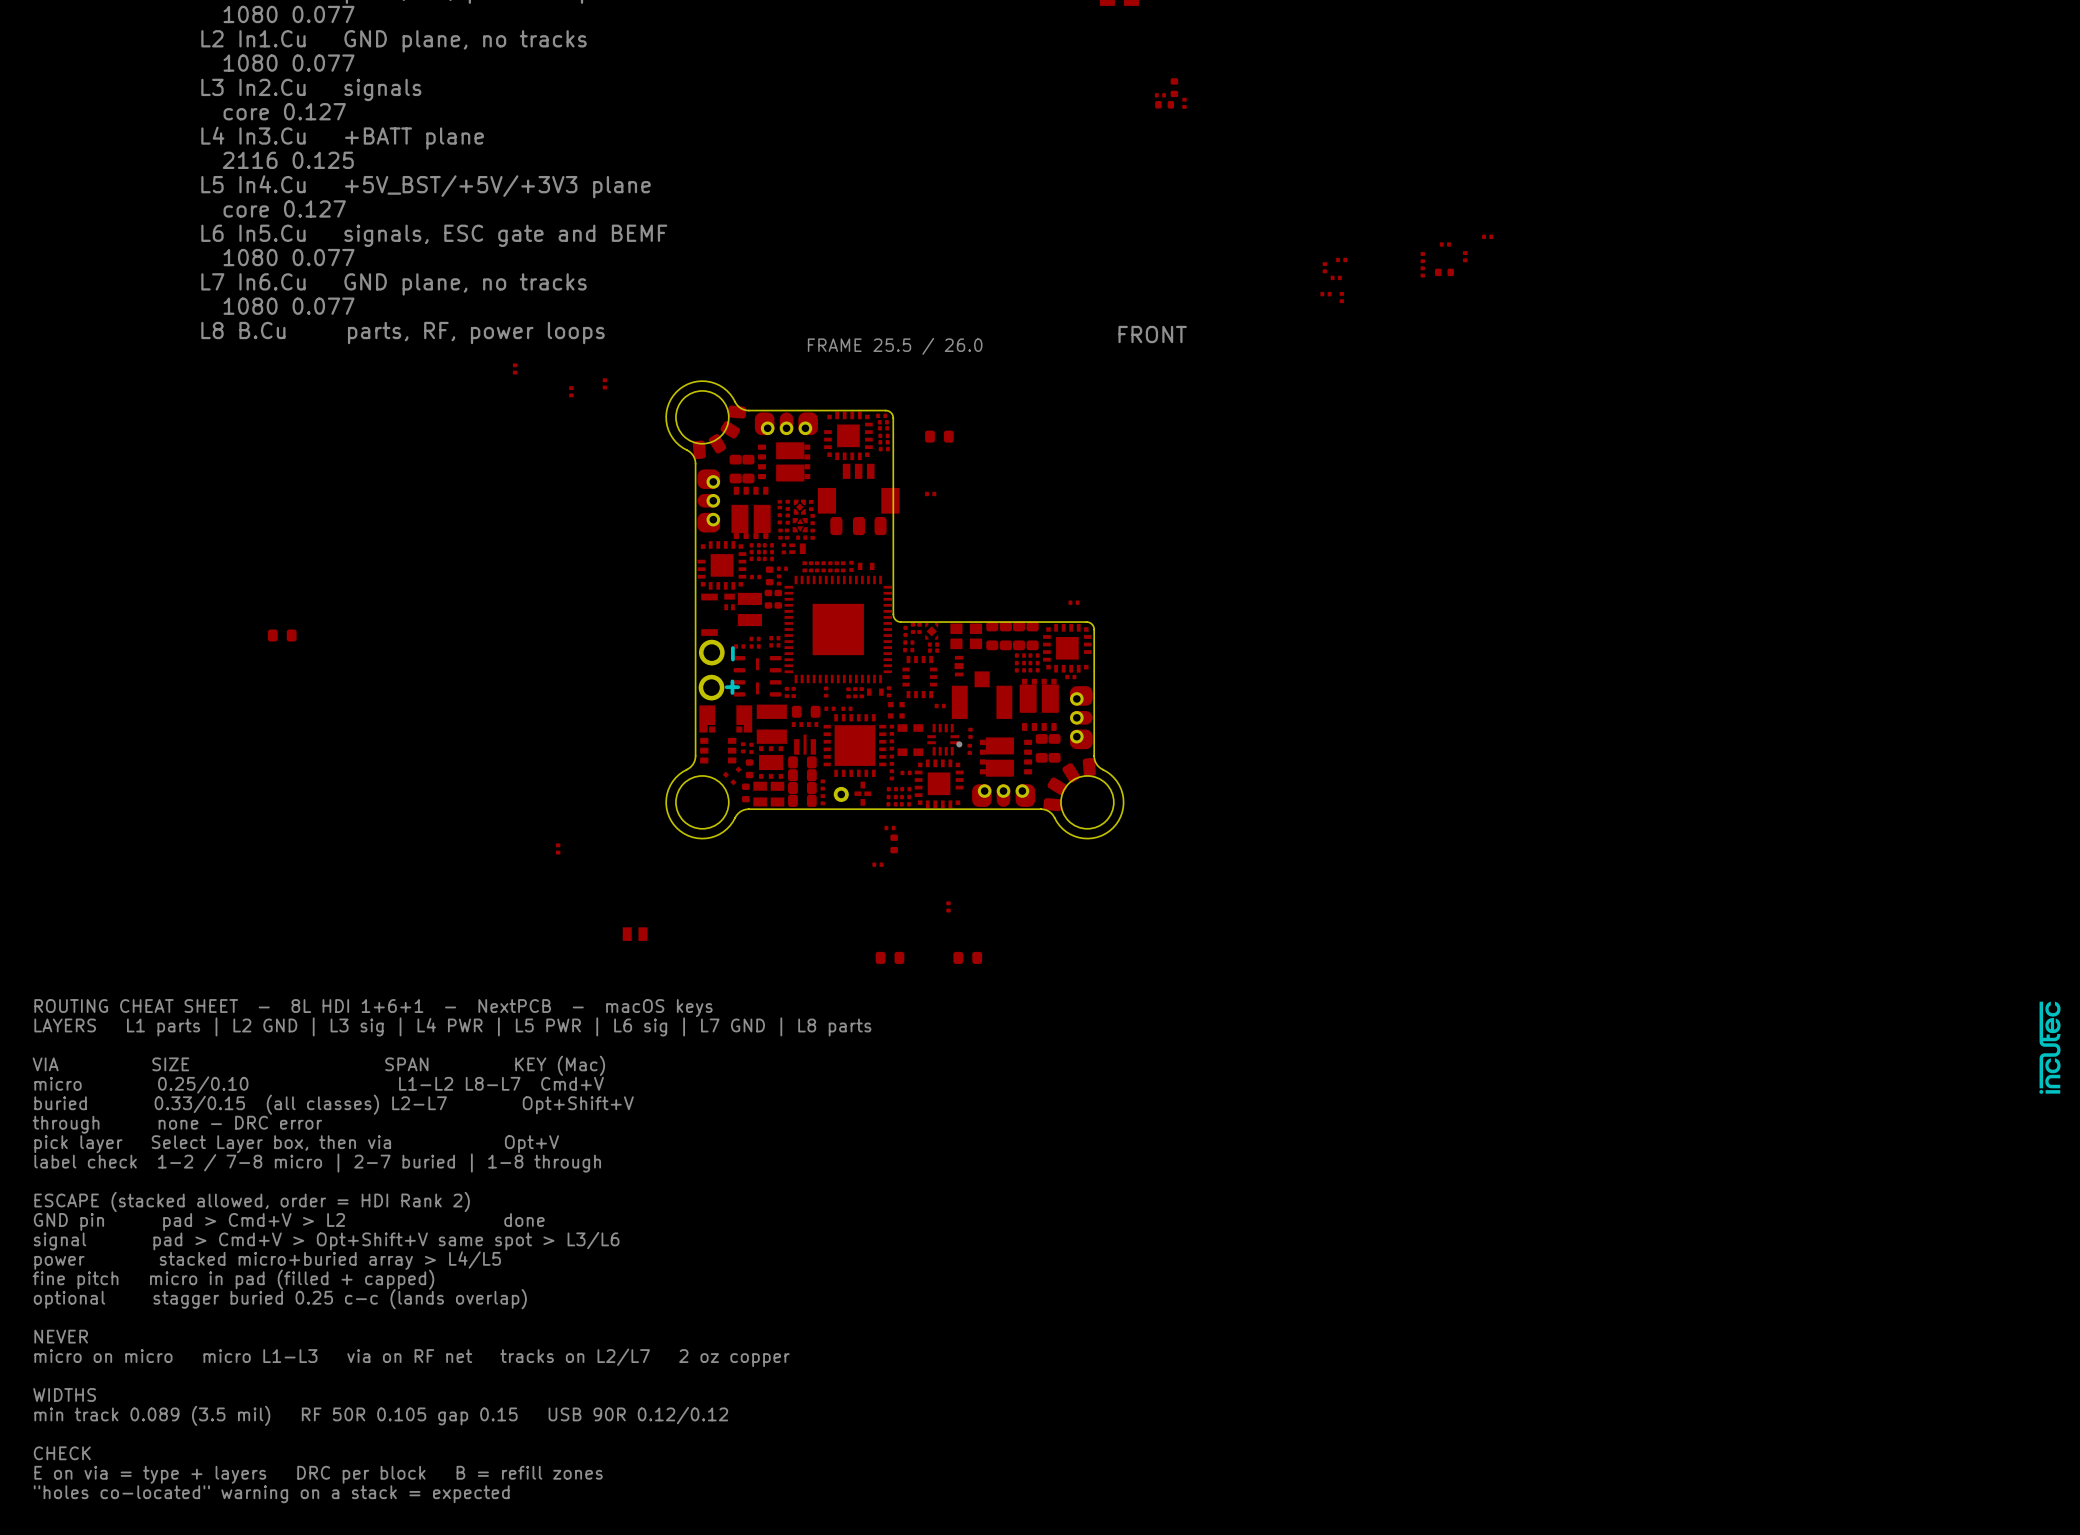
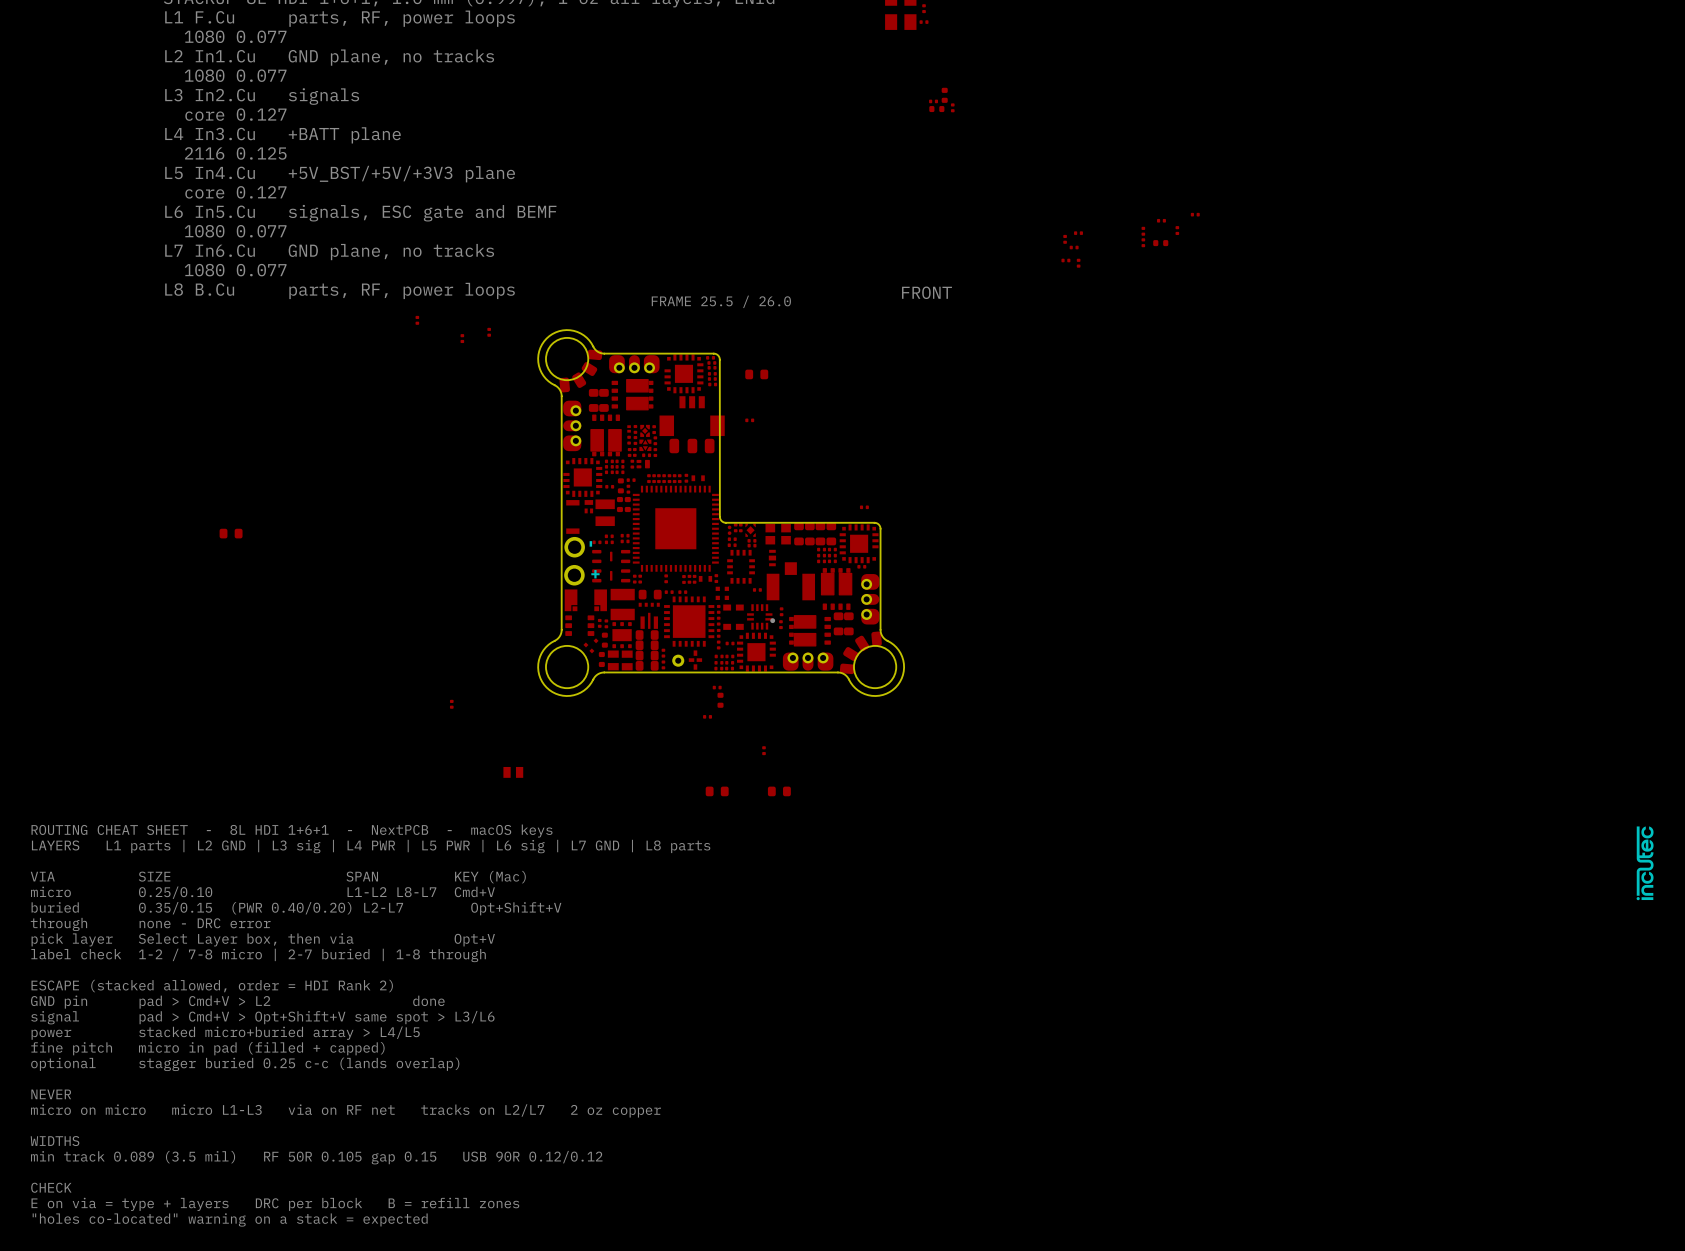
text: buried 0.33/0.15 (all classes) L2-L7 Opt+Shift+V (334, 1104) -> buried 0.35/0.15 (PWR 0.40/0.20) L2-L7 Opt+Shift+V (296, 908)

